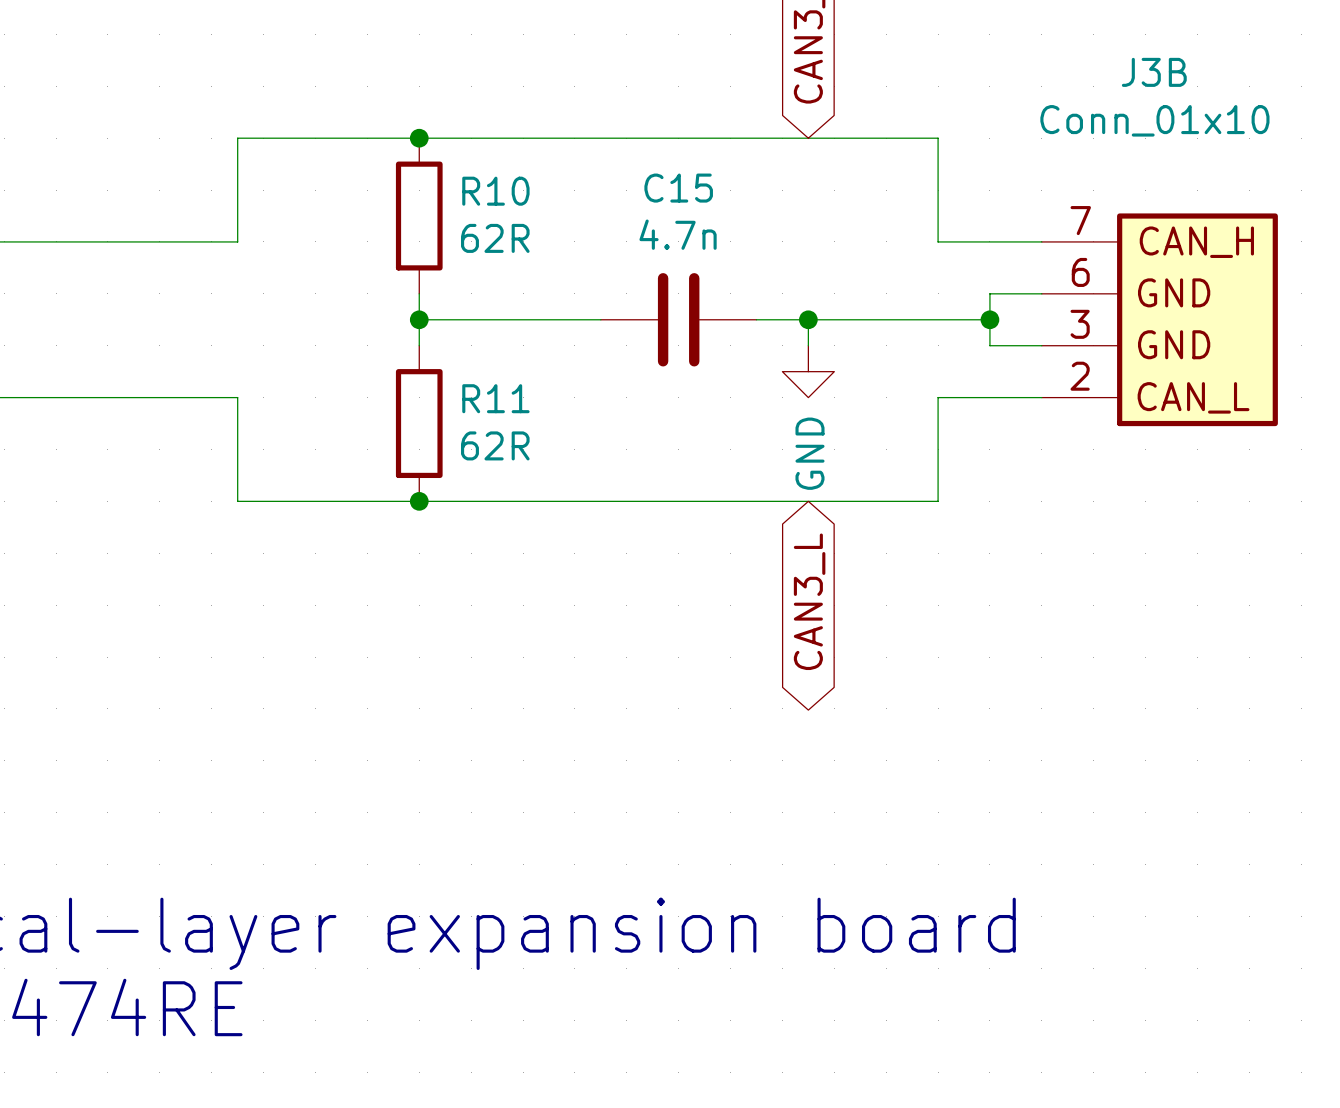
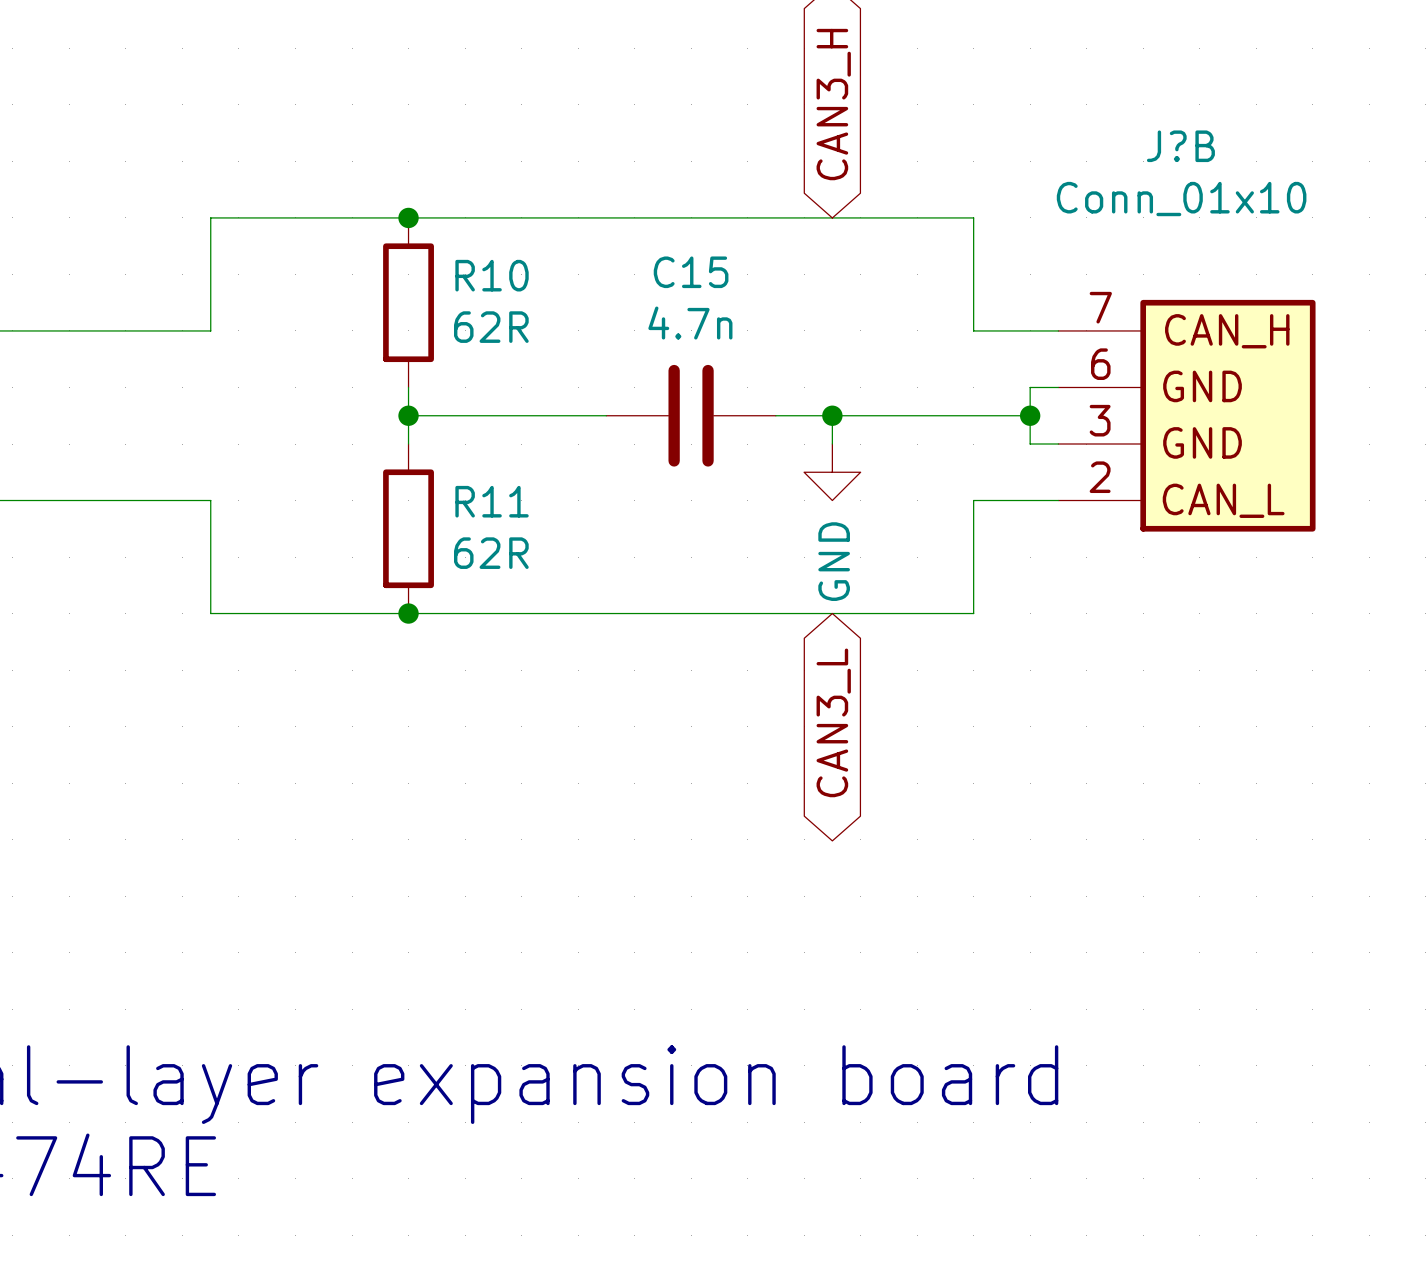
J?B: none -> Conn_01x10 (1186, 415)
J3B: Conn_01x10 (1159, 319) -> none

